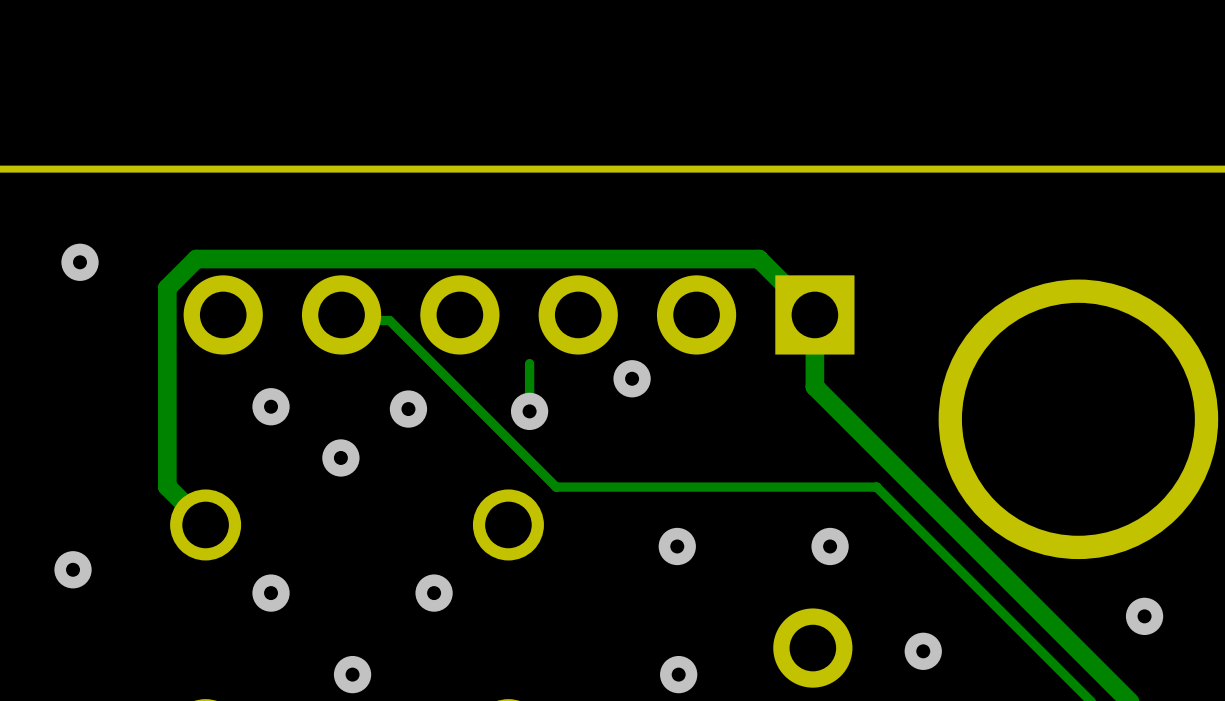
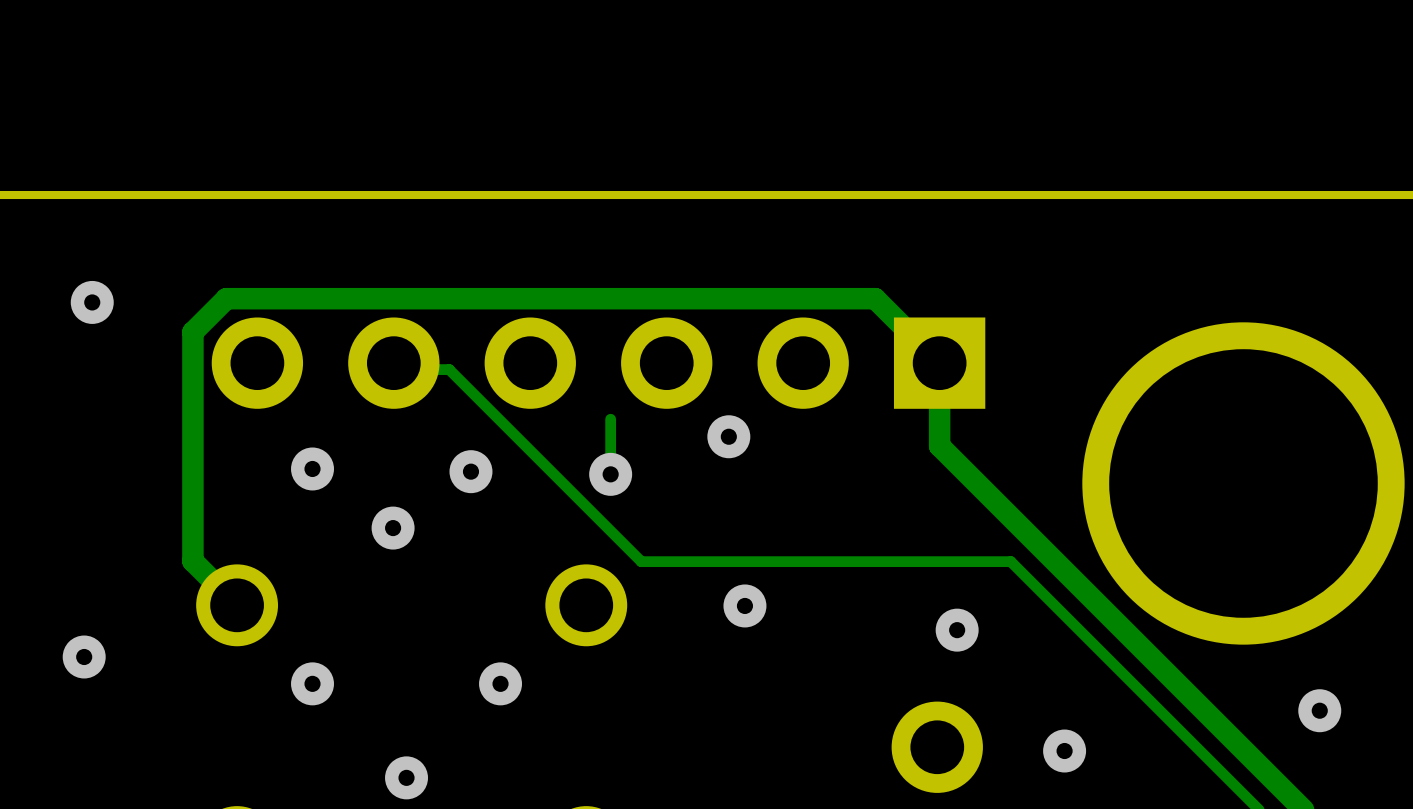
via position: (677, 546) -> (744, 605)
via: (678, 674) -> none

